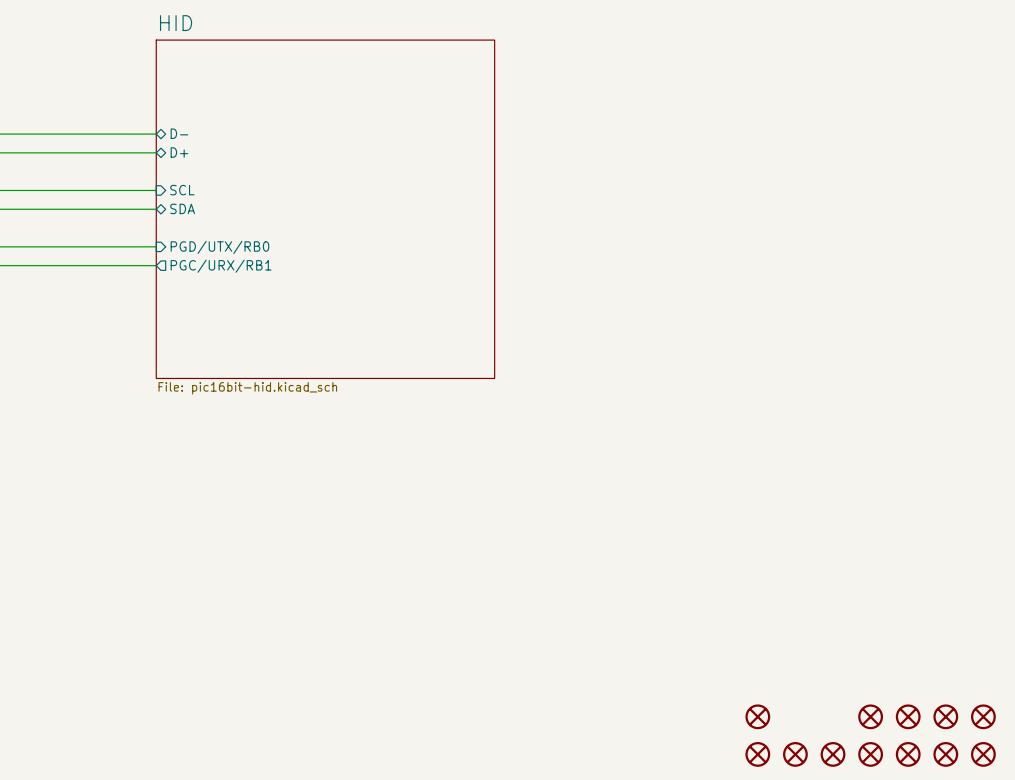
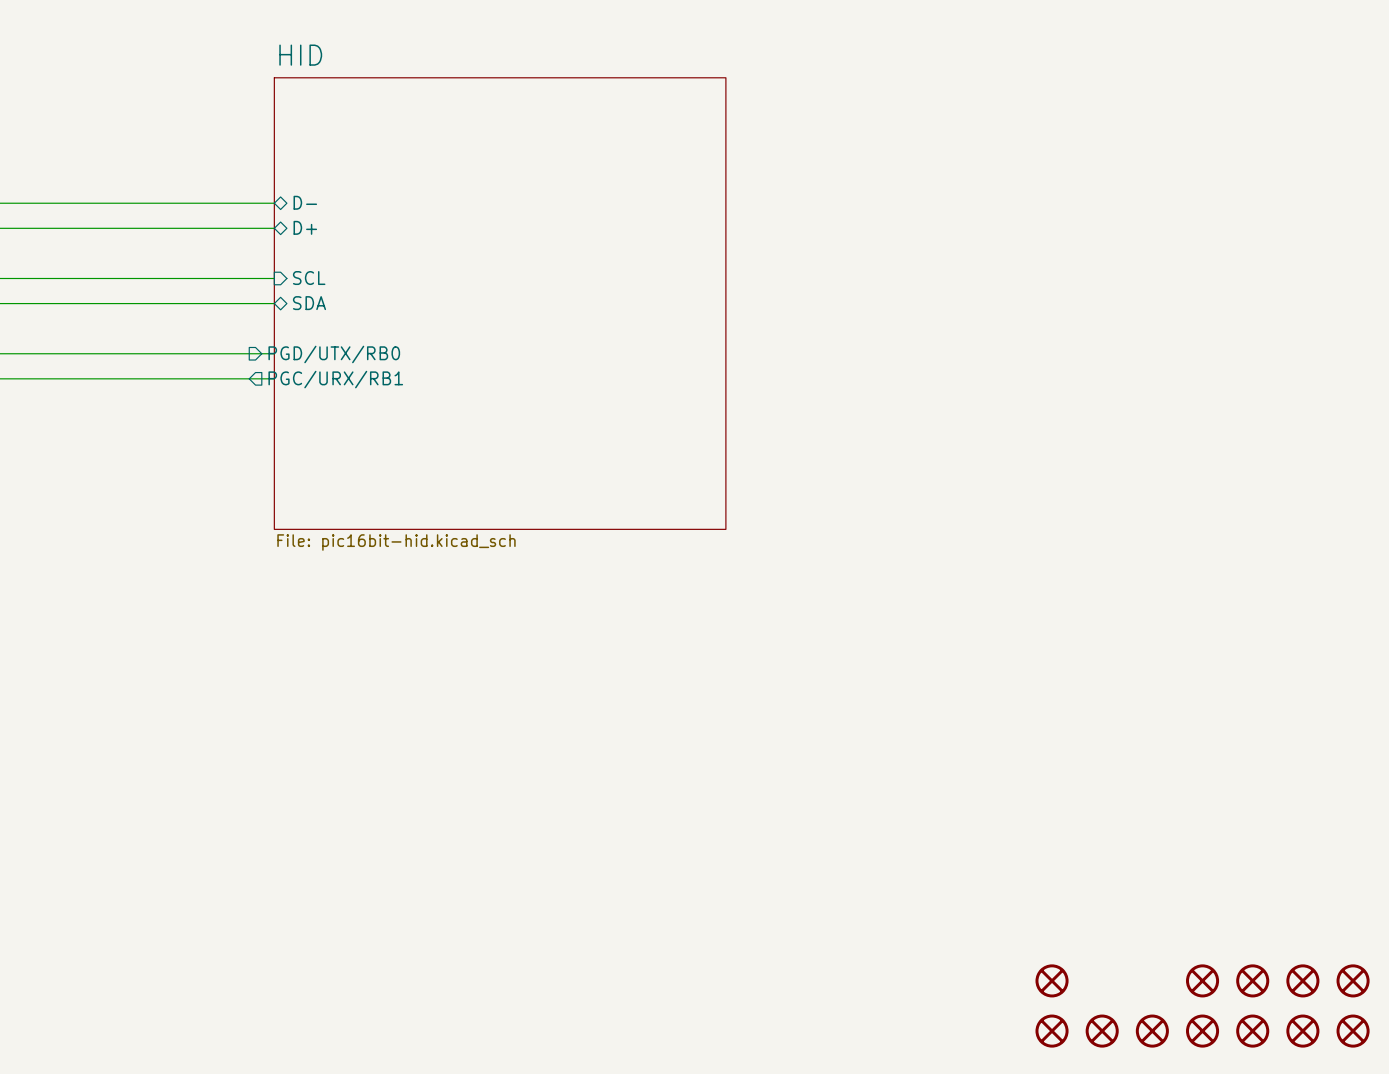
sheet pin position: D- (179, 133) -> D- (305, 202)
wire: none -> (249, 203) (274, 203)
wire: none -> (249, 228) (274, 228)
sheet pin position: D+ (179, 152) -> D+ (305, 227)
wire: none -> (249, 278) (274, 278)
sheet pin position: SCL (182, 190) -> SCL (309, 278)
sheet pin position: SDA (182, 208) -> SDA (309, 303)
wire: none -> (249, 303) (274, 303)
sheet HID position: (325, 209) -> (500, 303)
wire: none -> (249, 353) (274, 353)
wire: none -> (249, 378) (274, 378)

